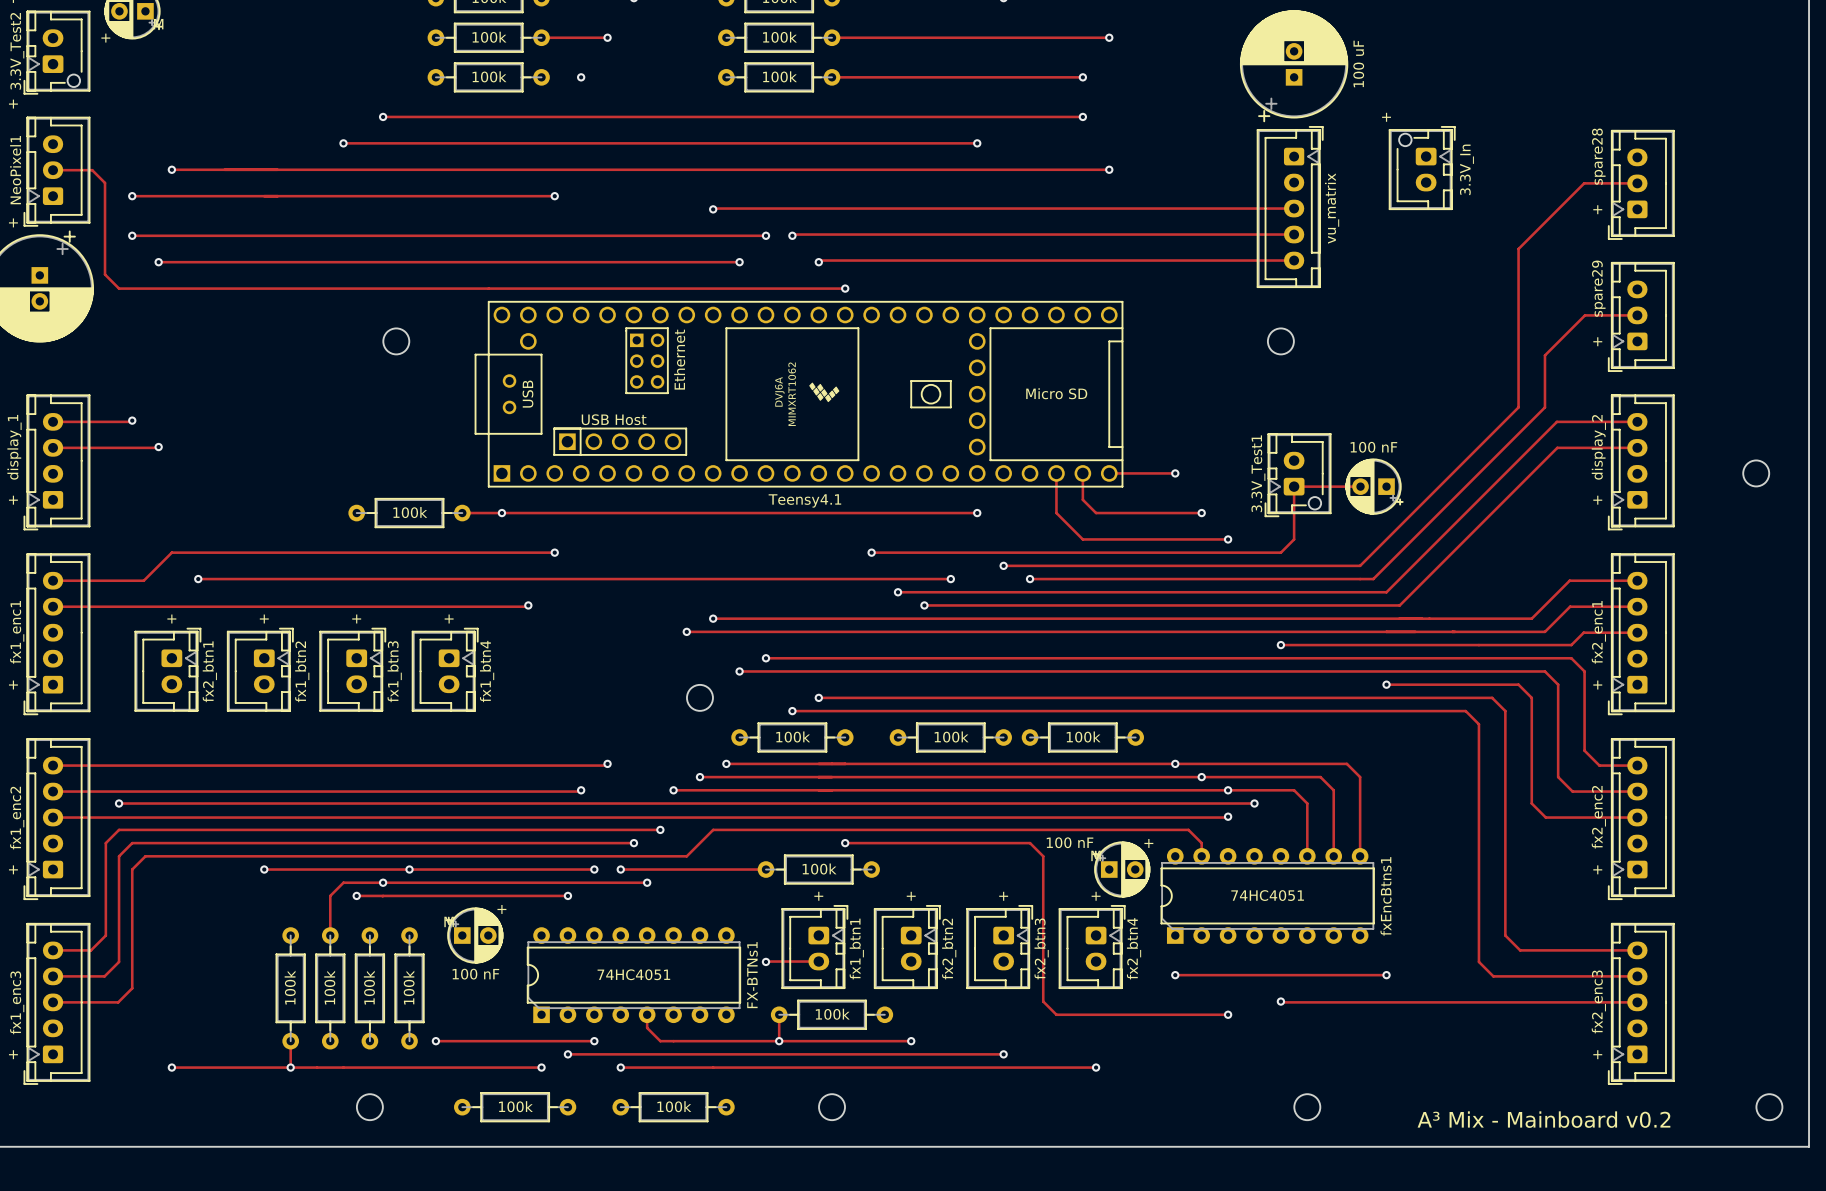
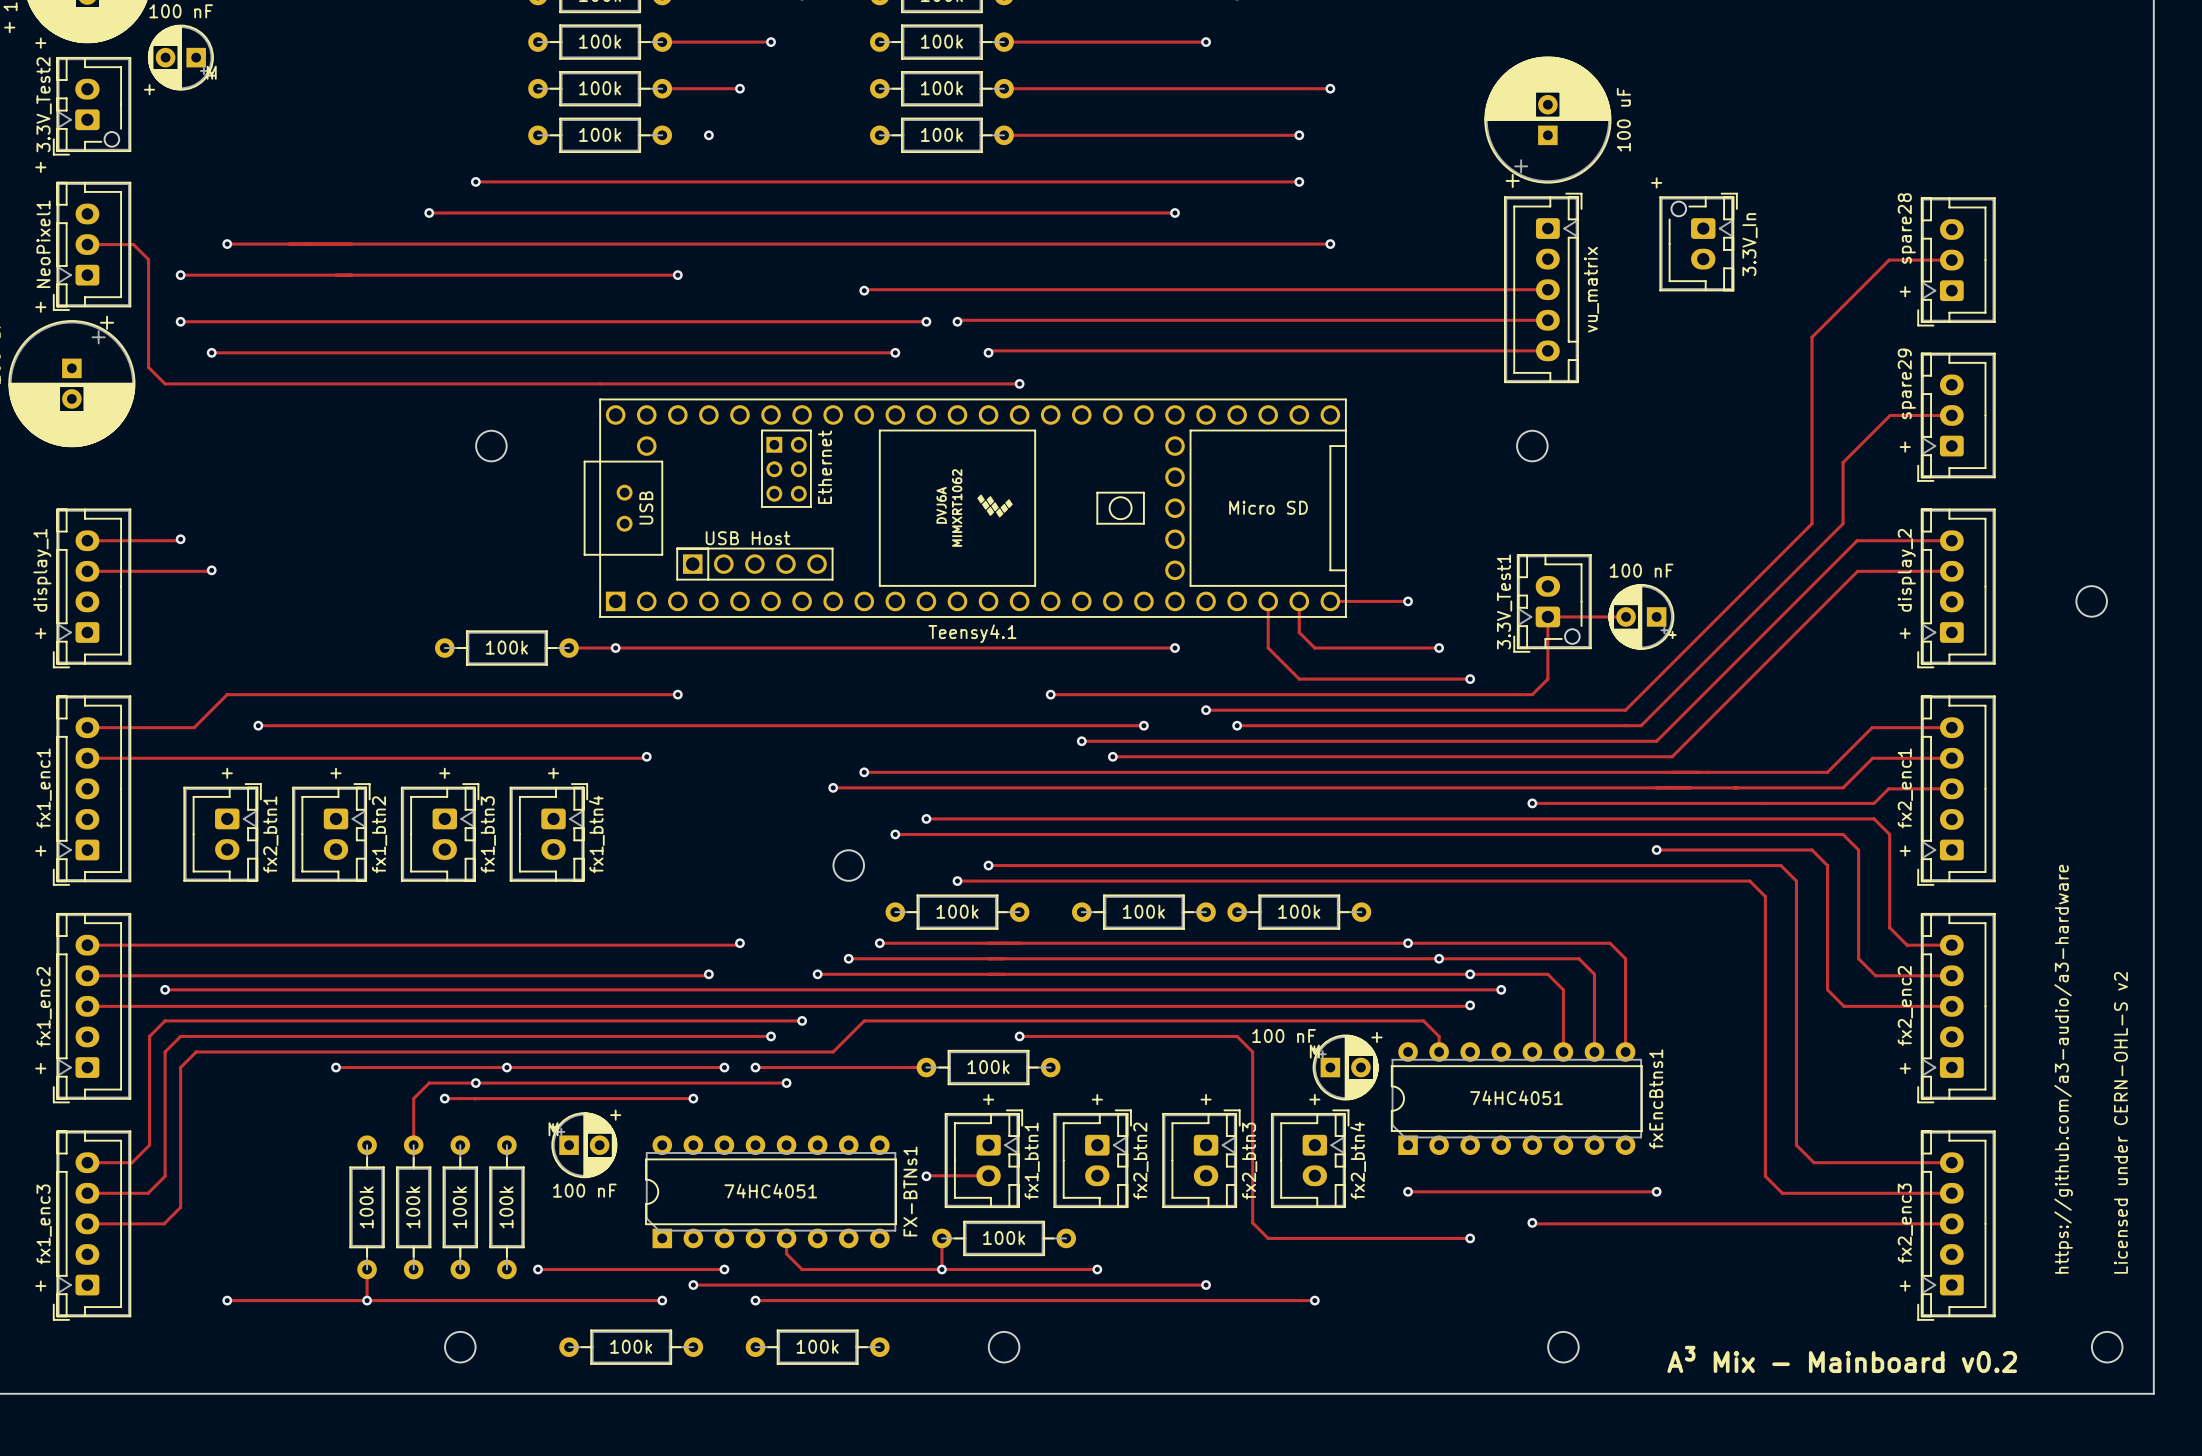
text: none -> https://github.com/a3-audio/a3-hardware (2063, 1069)
text: none -> Licensed under CERN-OHL-S v2 (2120, 1122)

